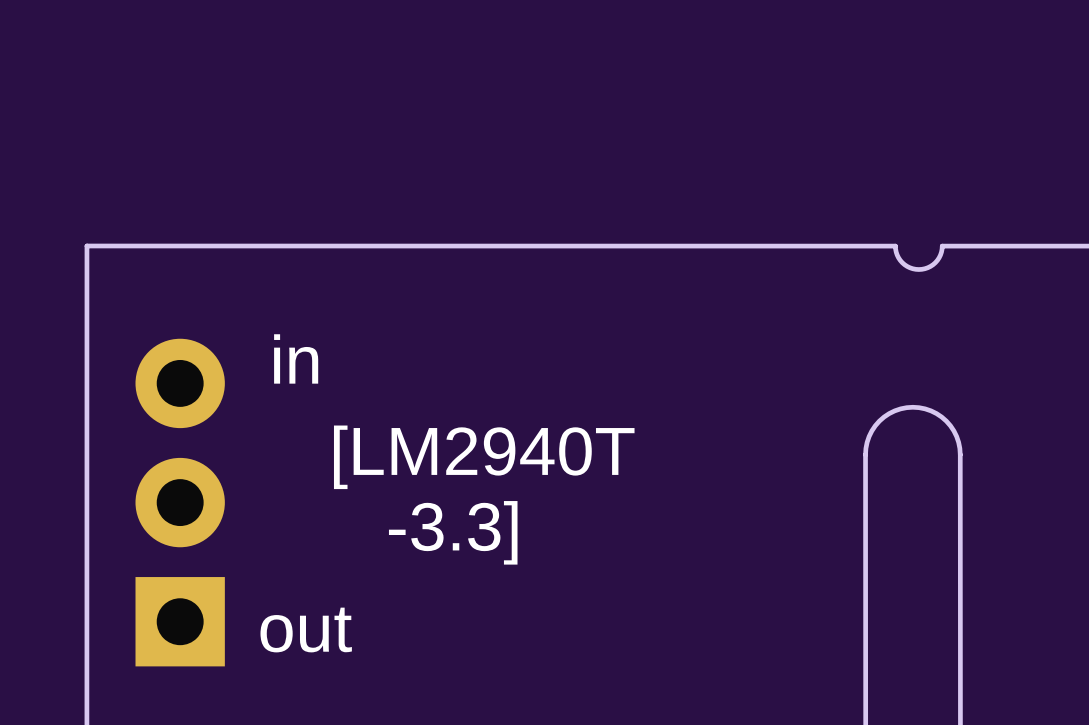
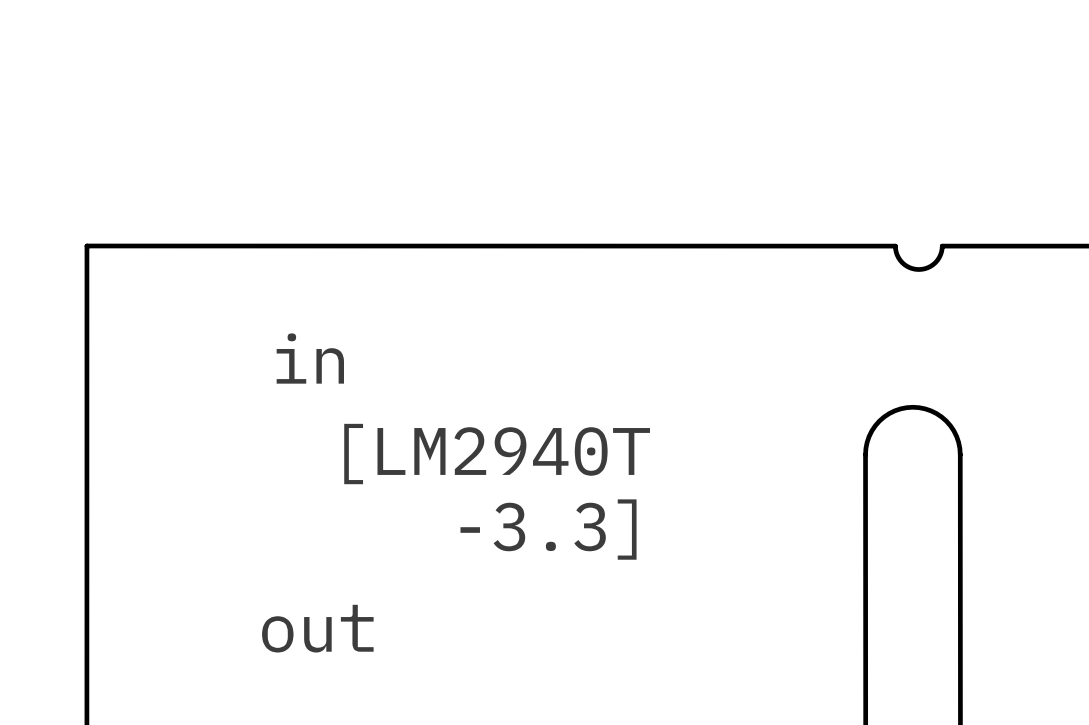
part: (180, 502) -> none

